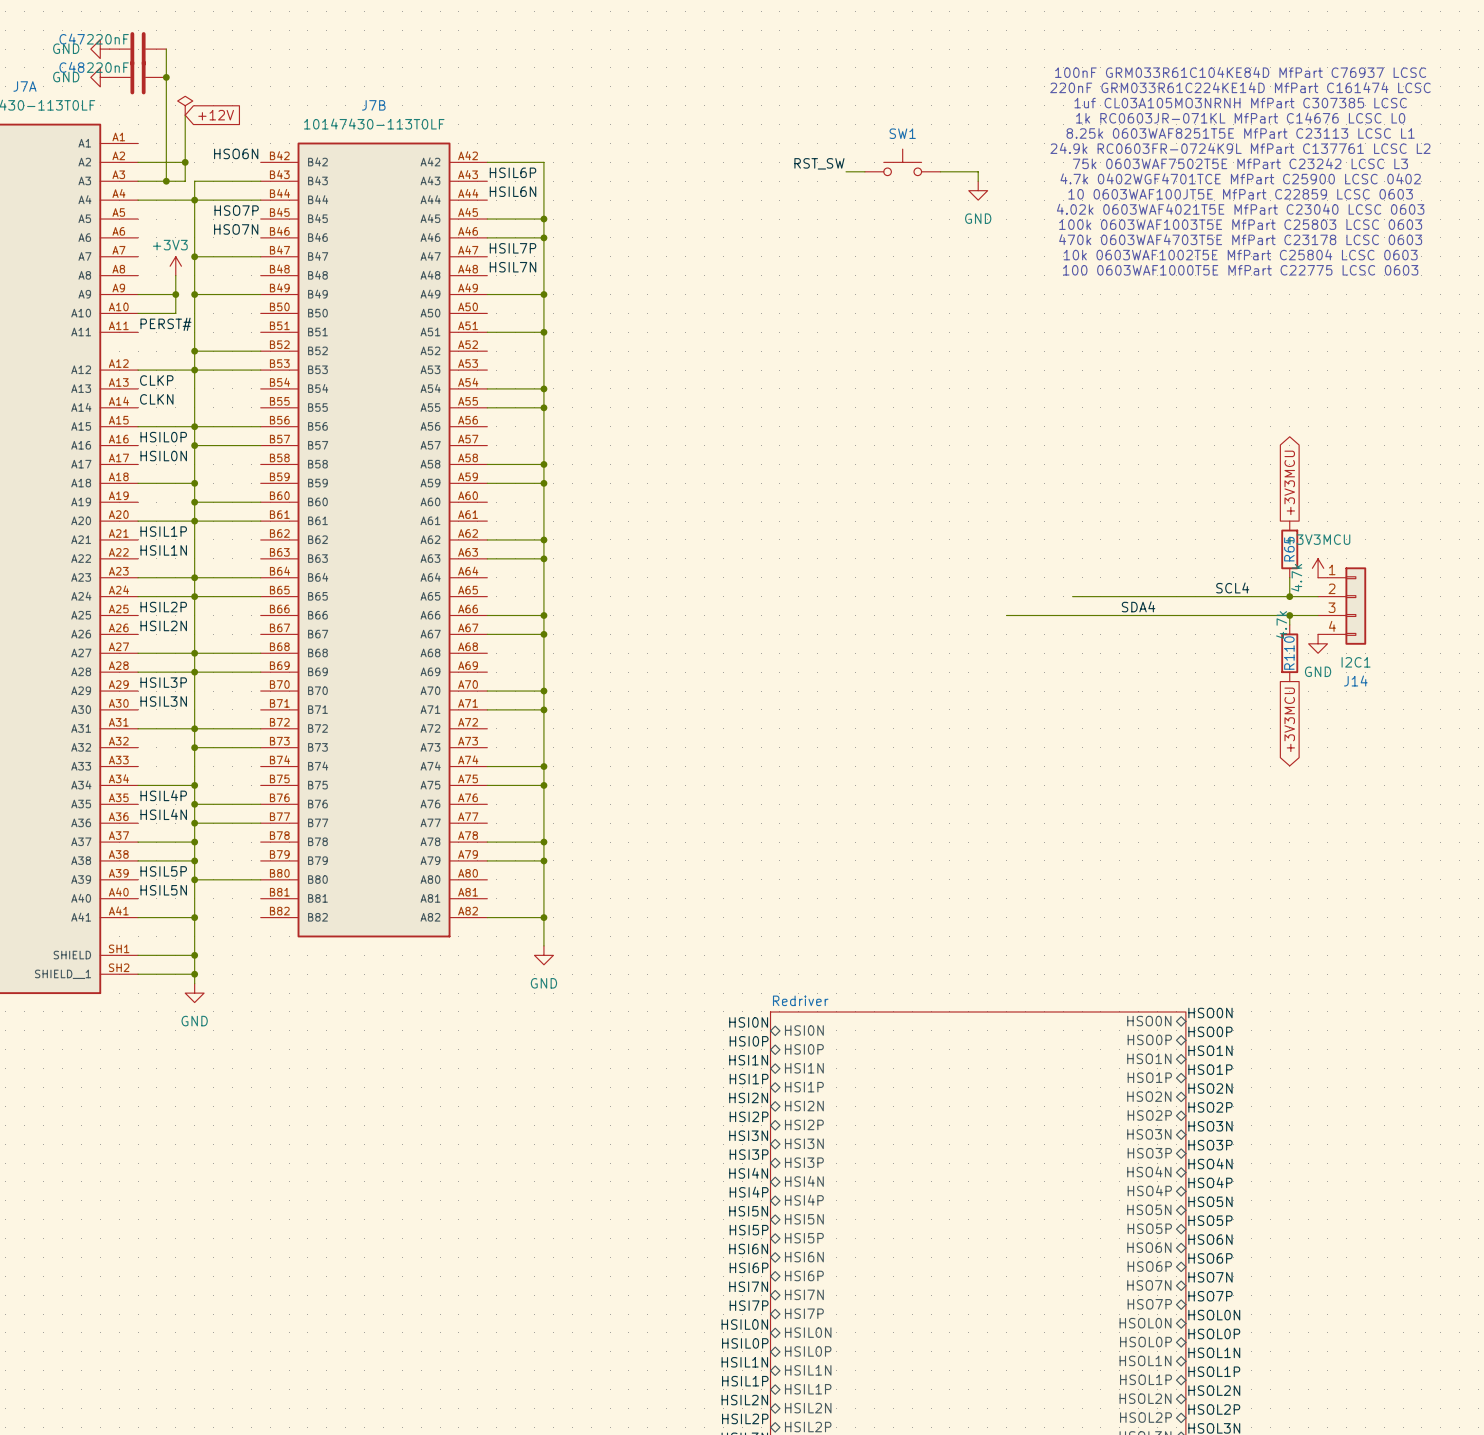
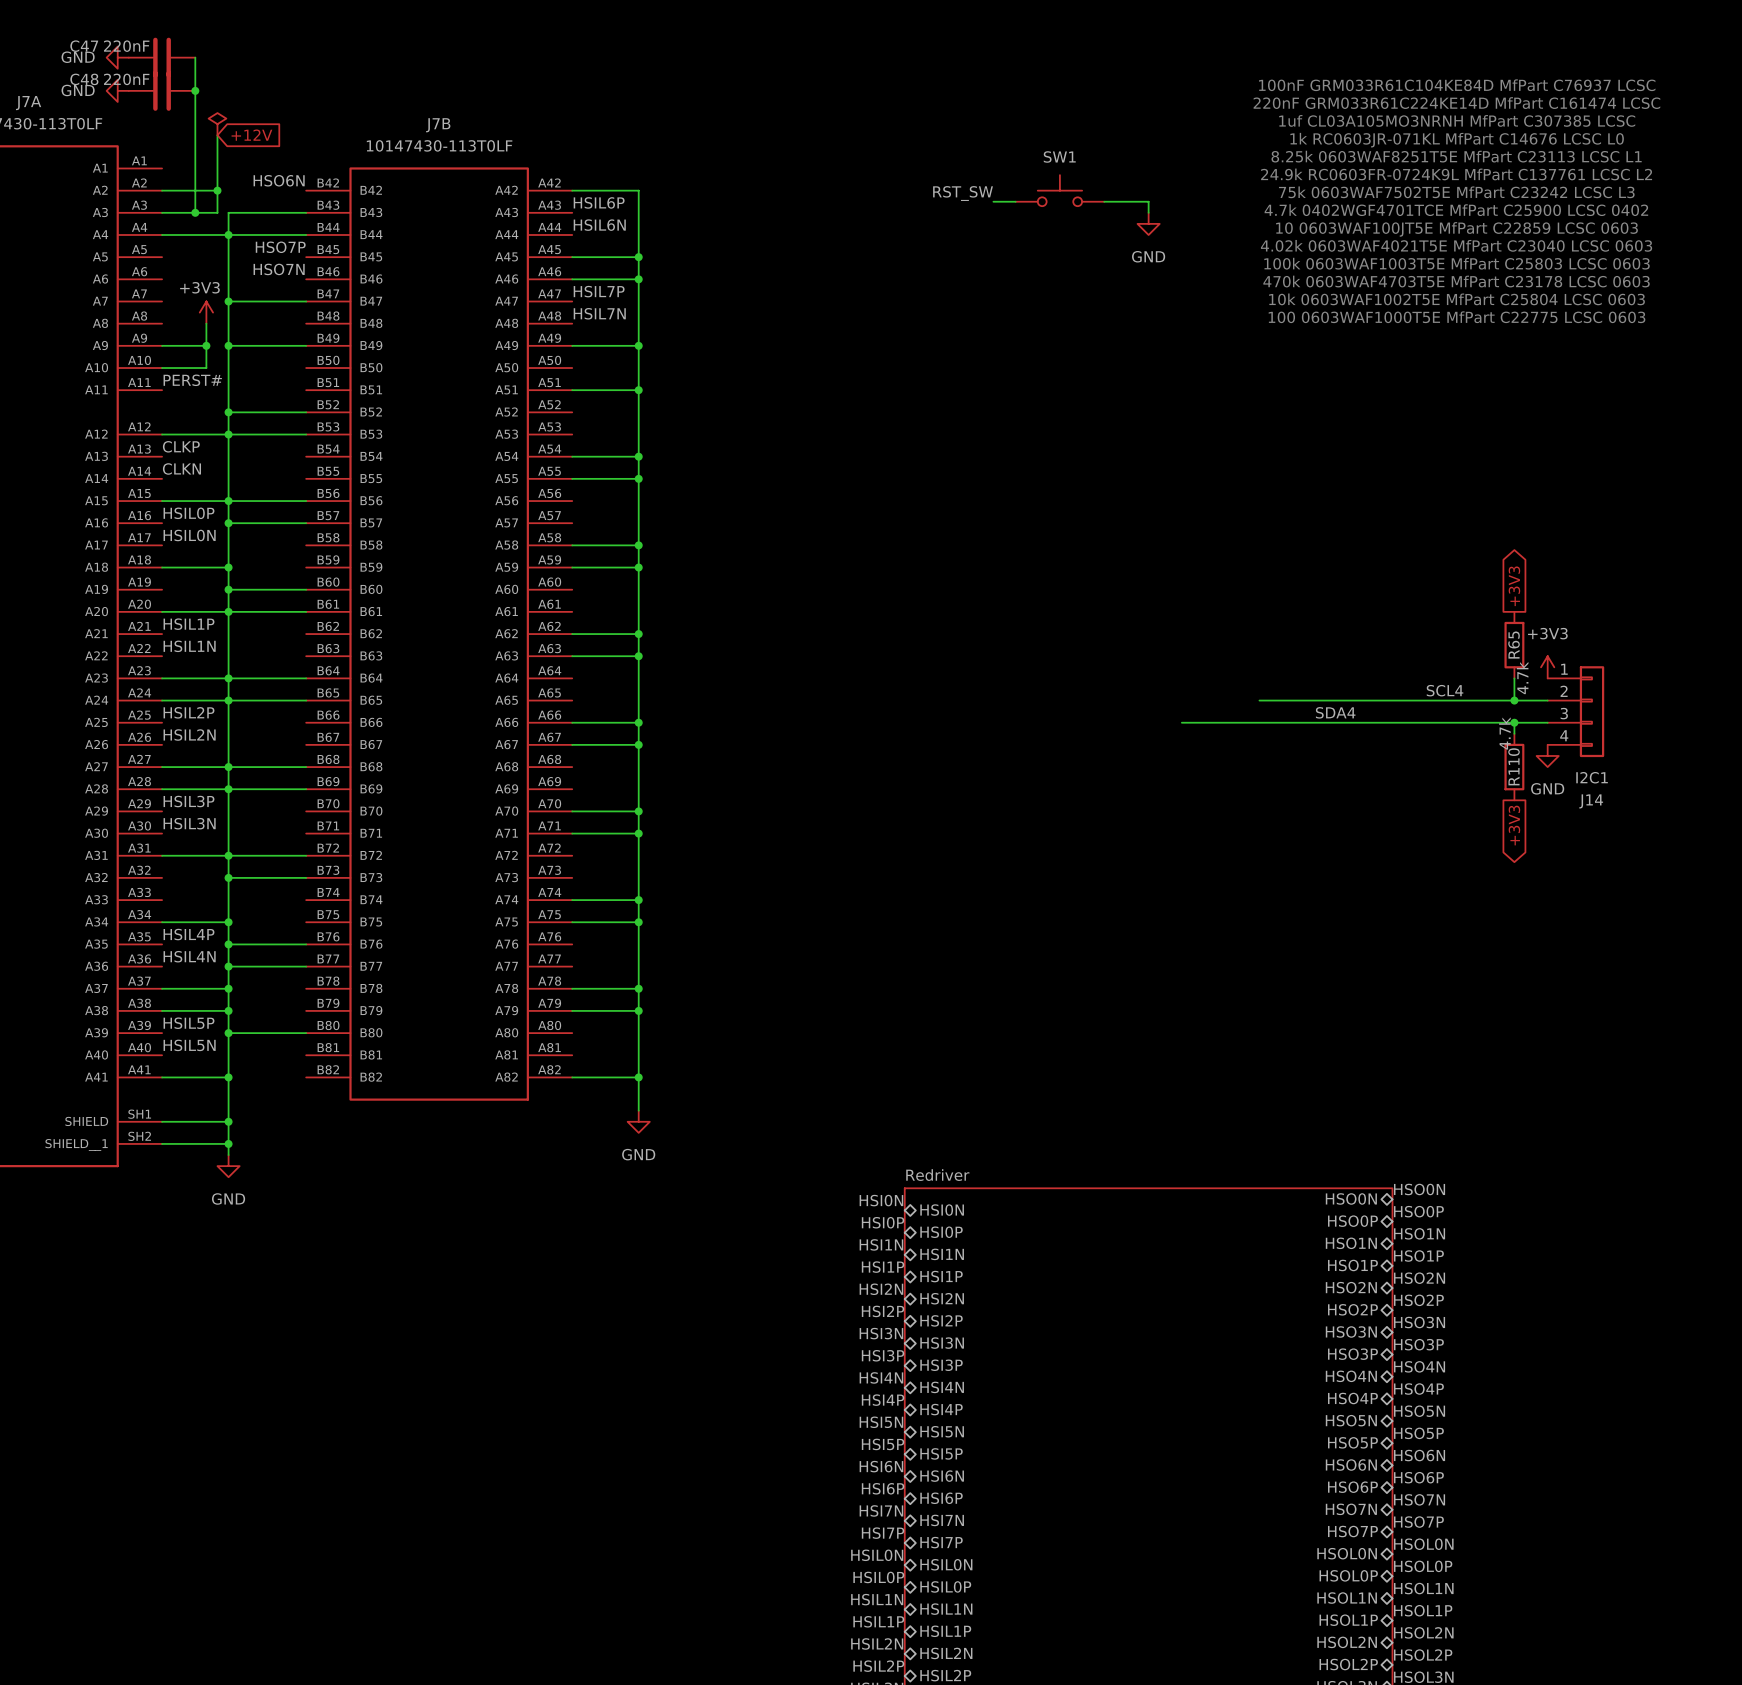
global label: +3V3MCU (1289, 482) -> +3V3 (1514, 586)
power symbol: +3V3MCU (1318, 568) -> +3V3 (1547, 667)
global label: +3V3MCU (1289, 719) -> +3V3 (1514, 825)

